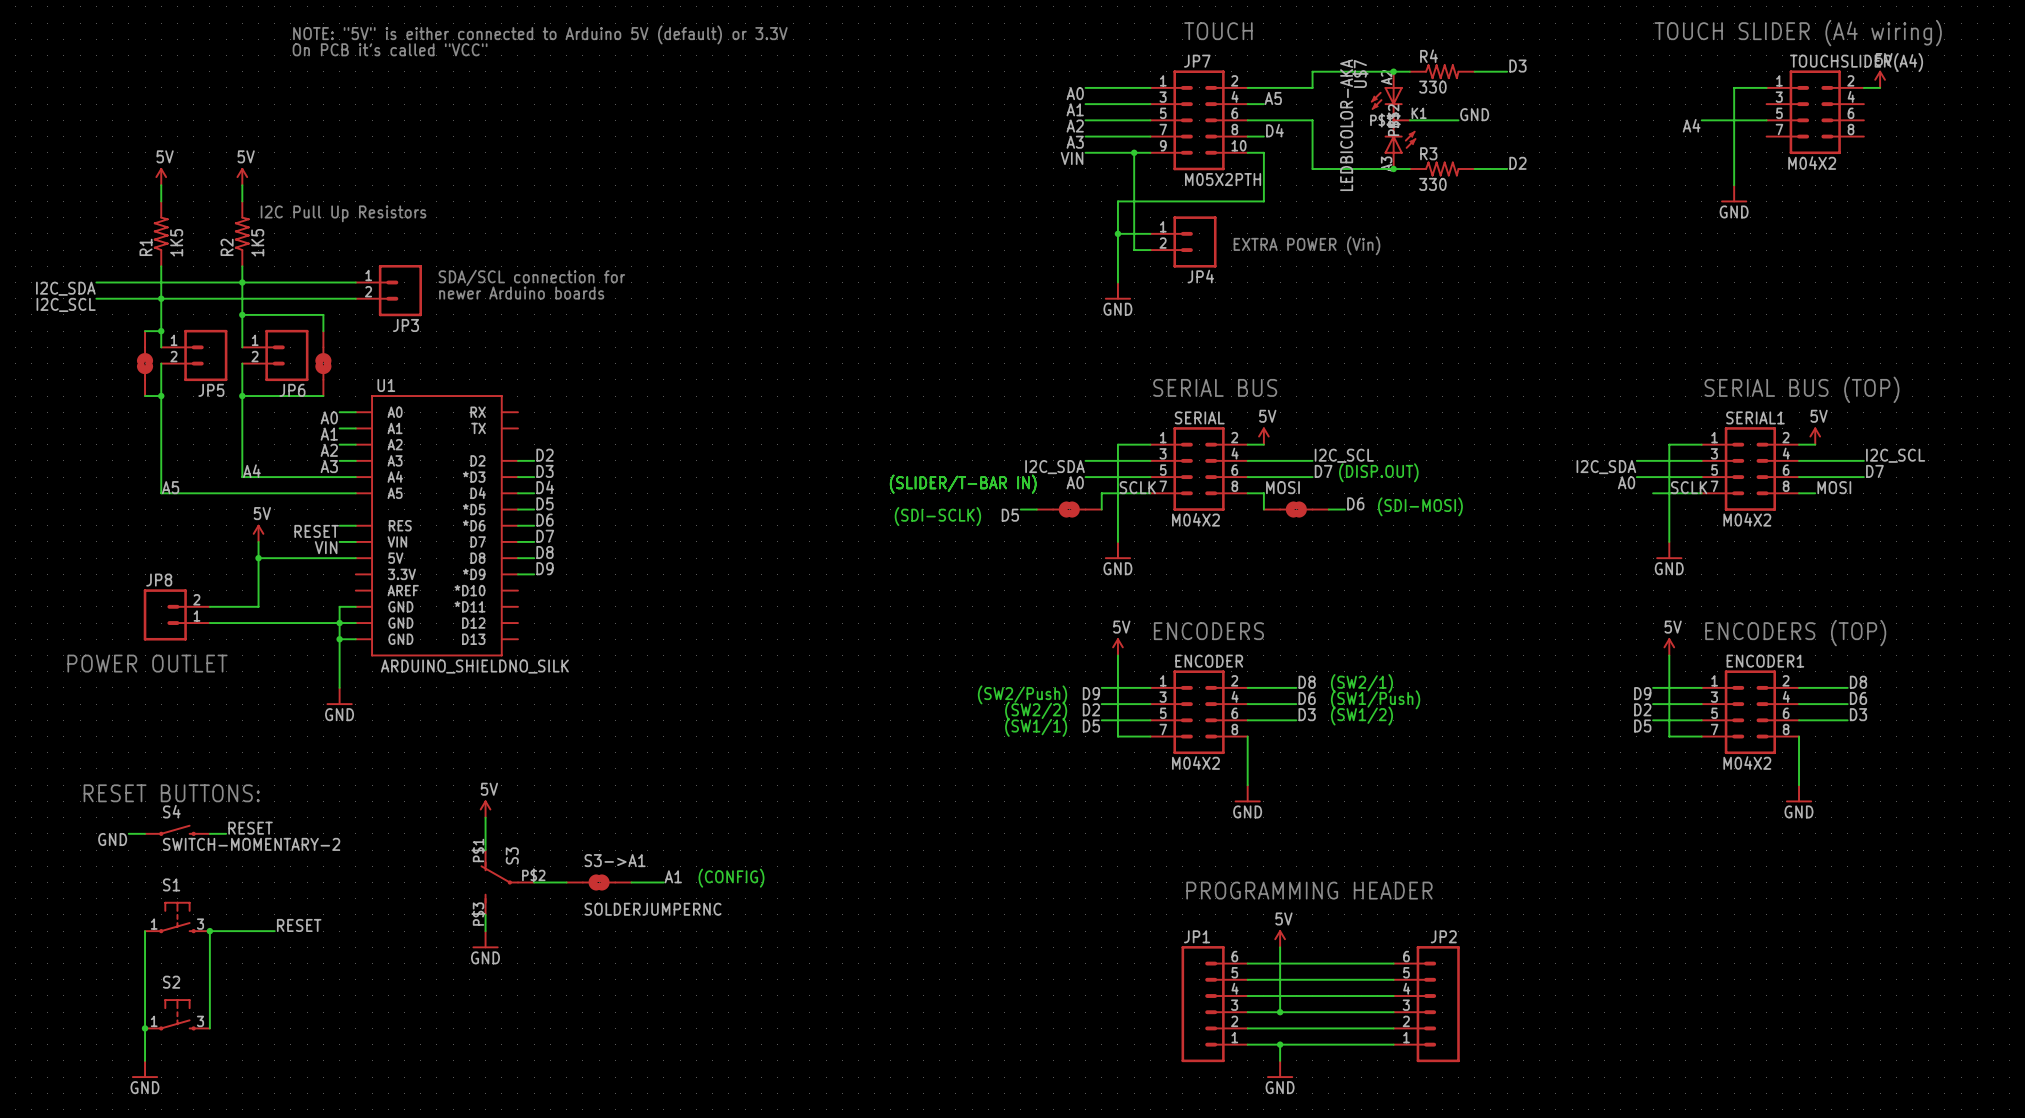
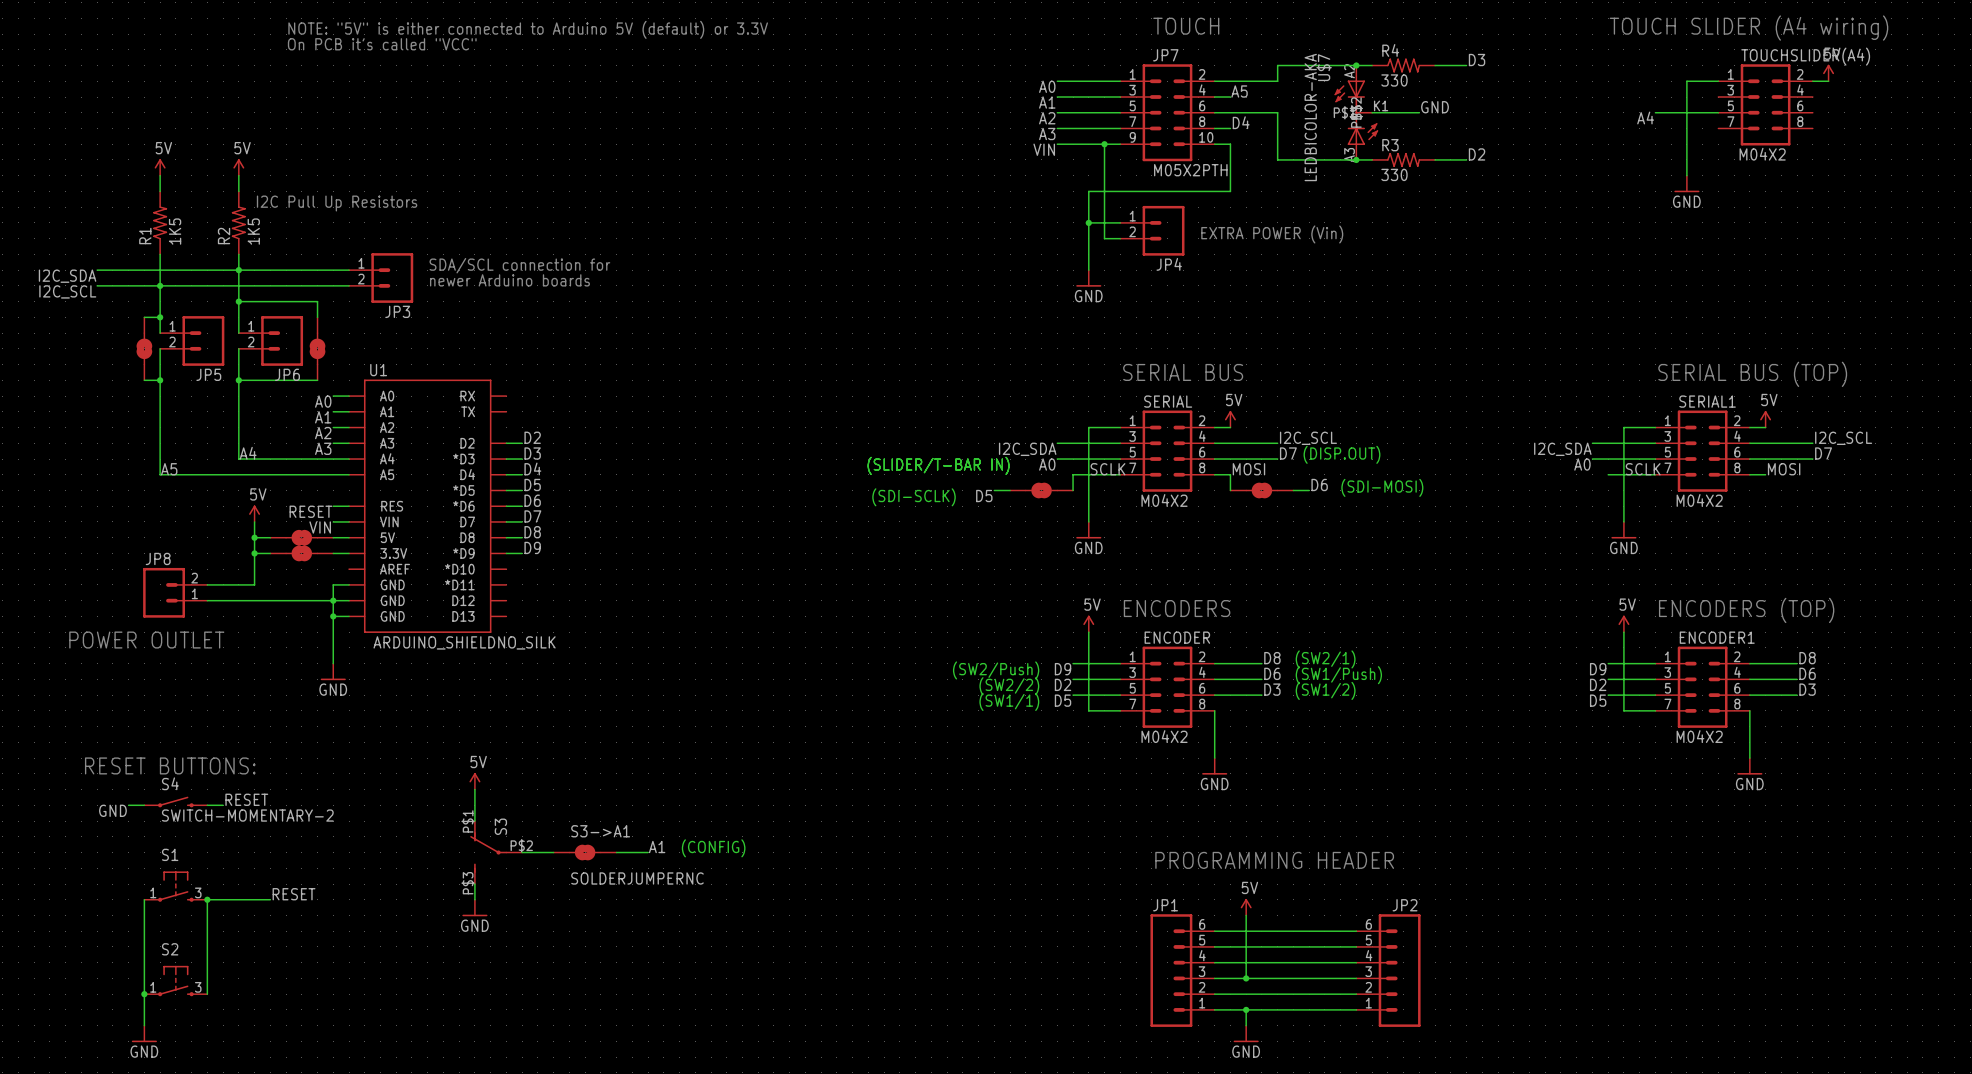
part: none -> (301, 537)
wire: none -> (254, 553) (270, 553)
junction: none -> (254, 553)
part: none -> (301, 553)
wire: none -> (333, 553) (349, 553)

